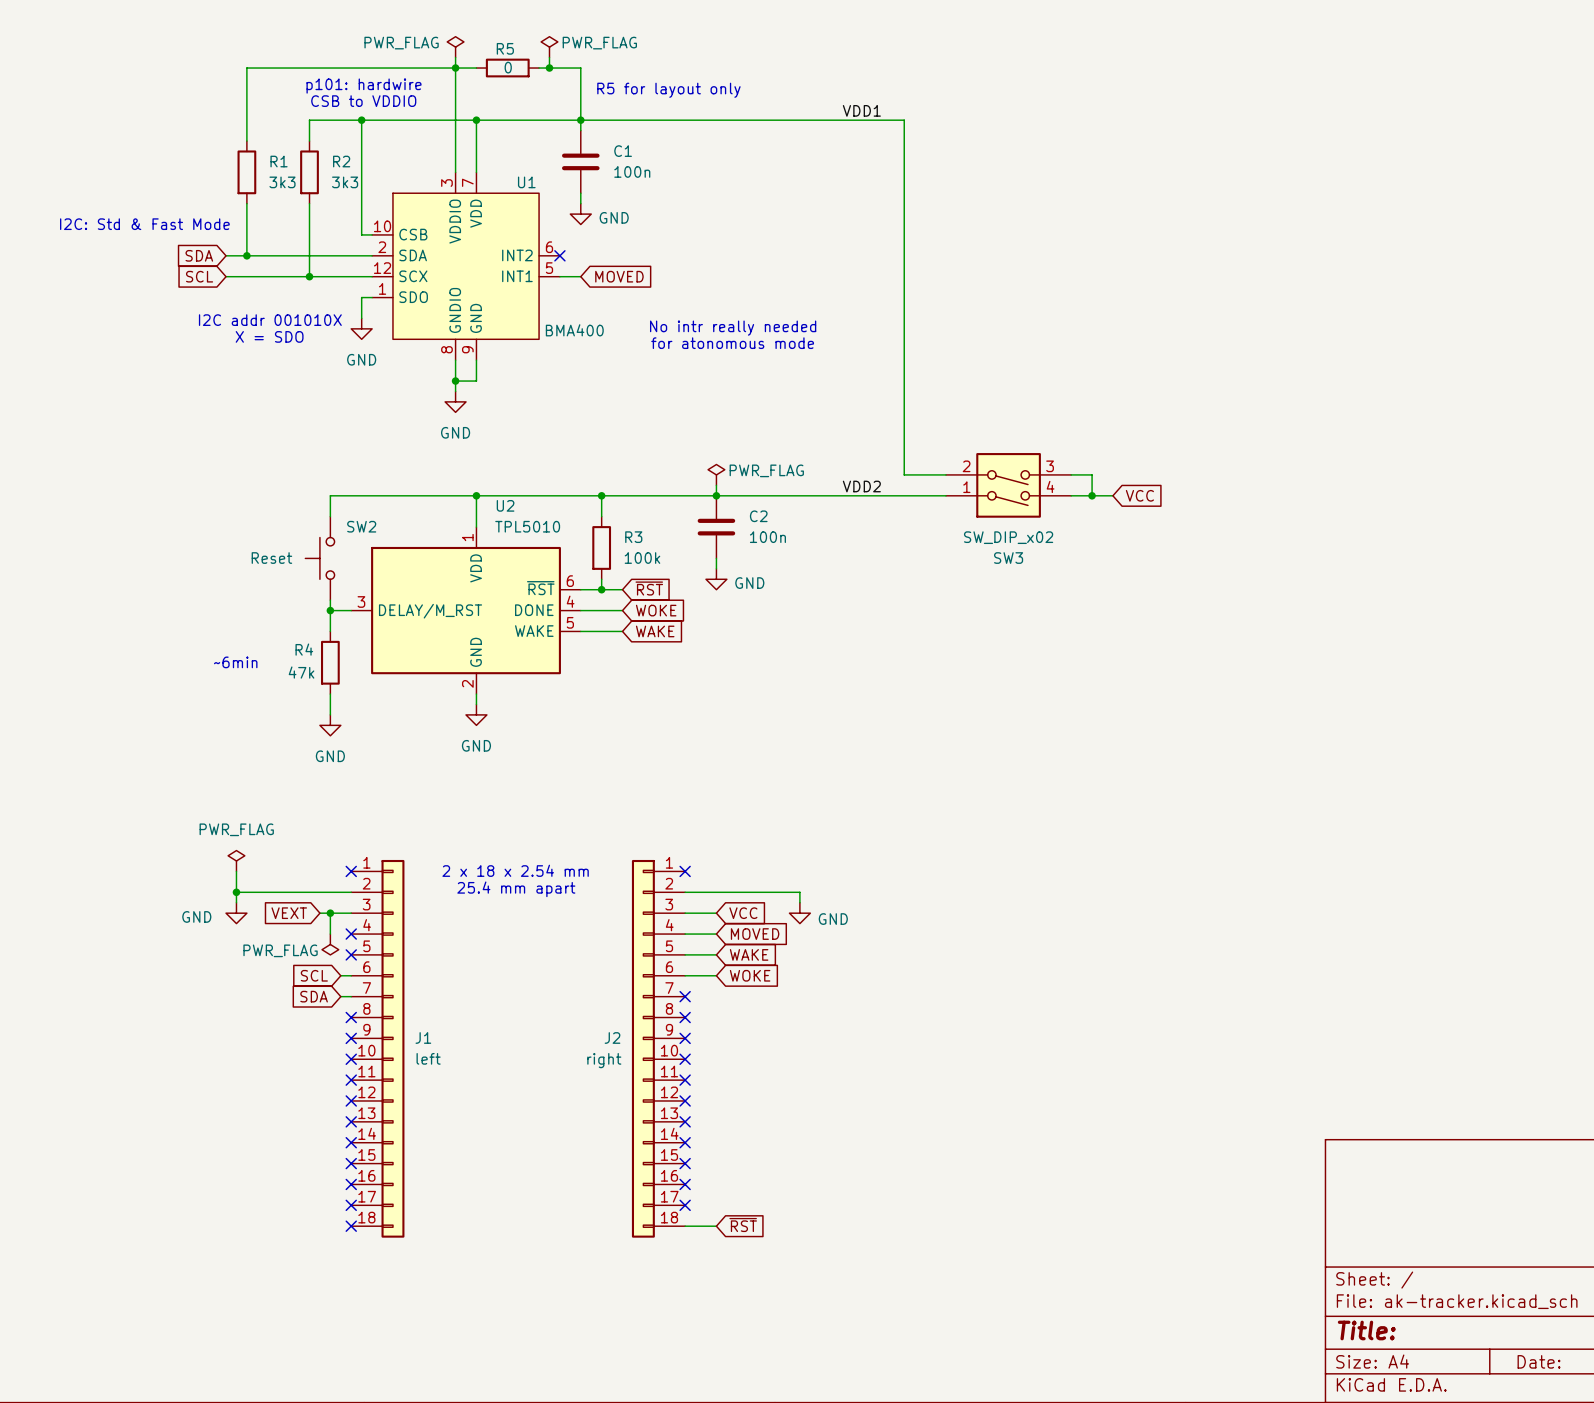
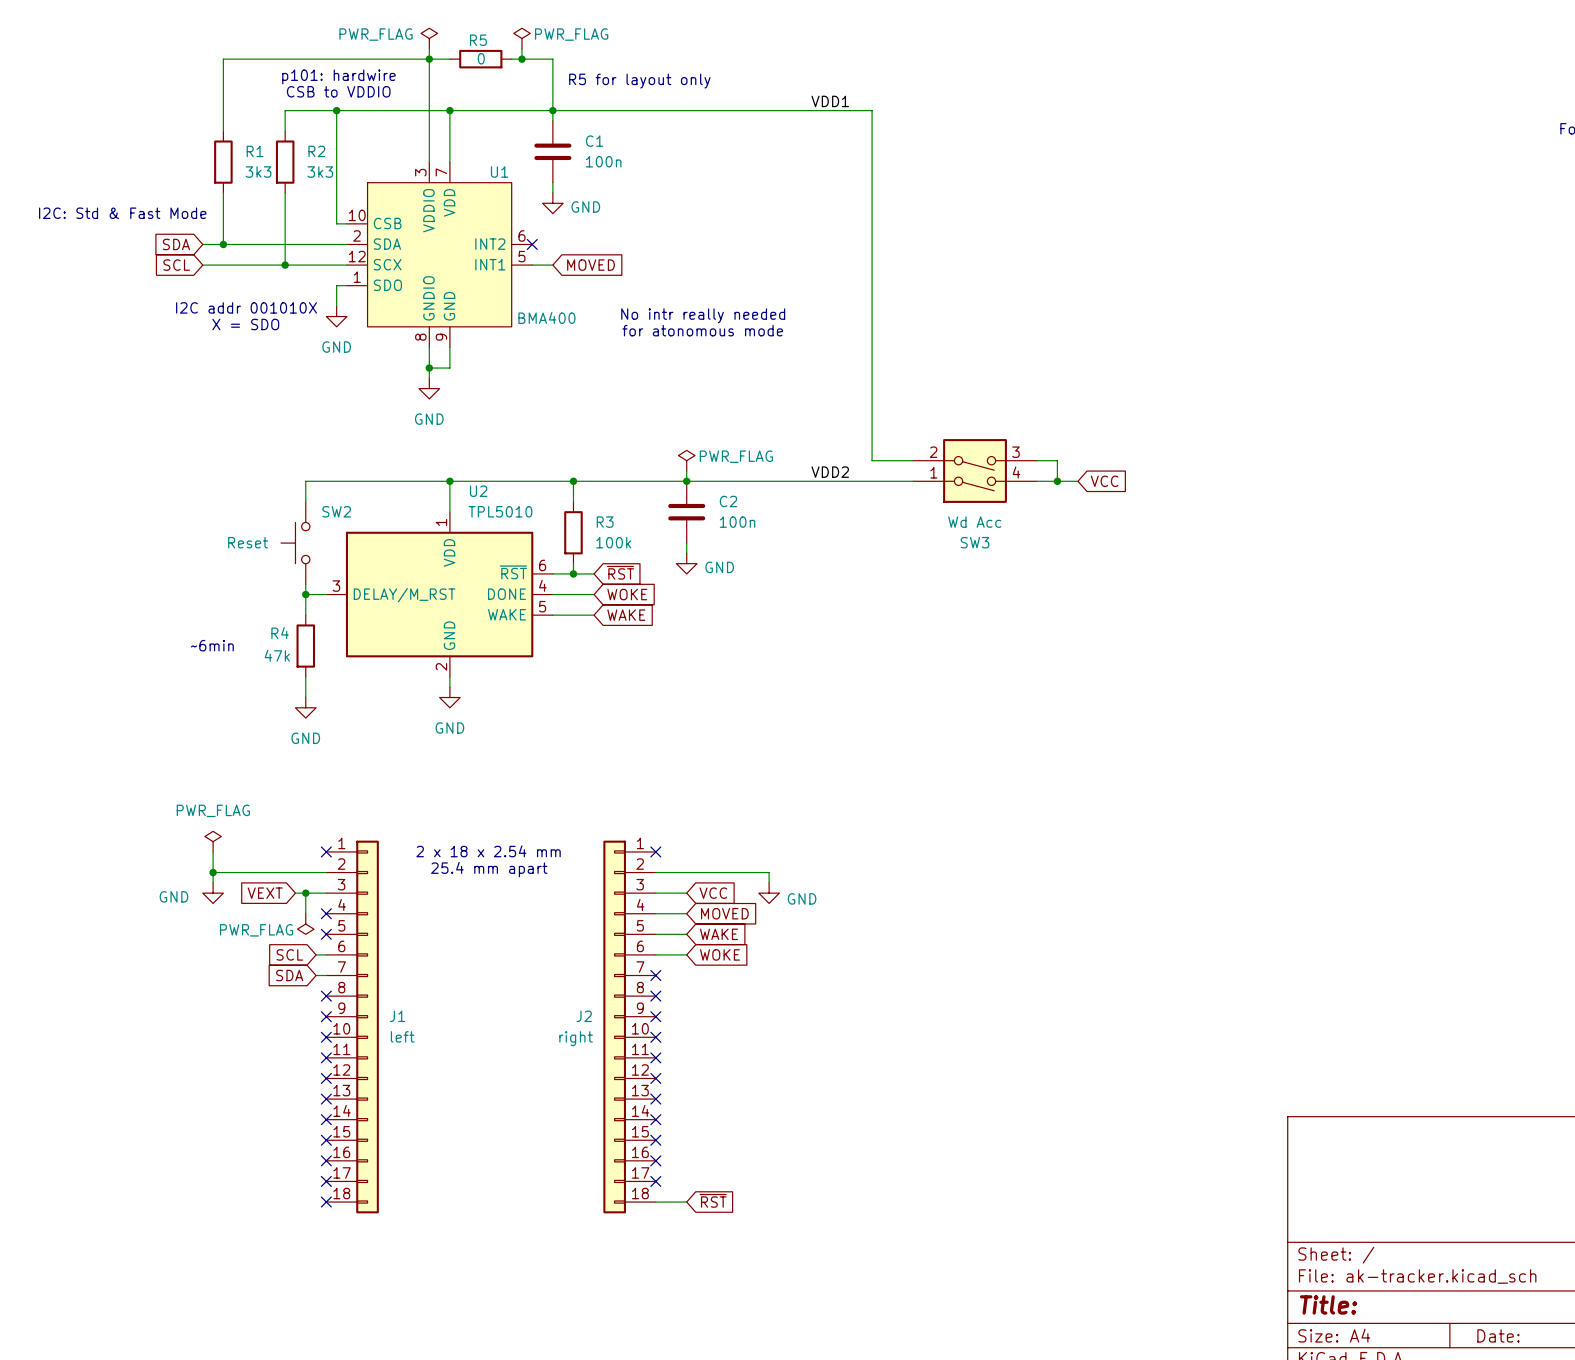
SW3 value: SW_DIP_x02 (1008, 537) -> Wd Acc (974, 522)

